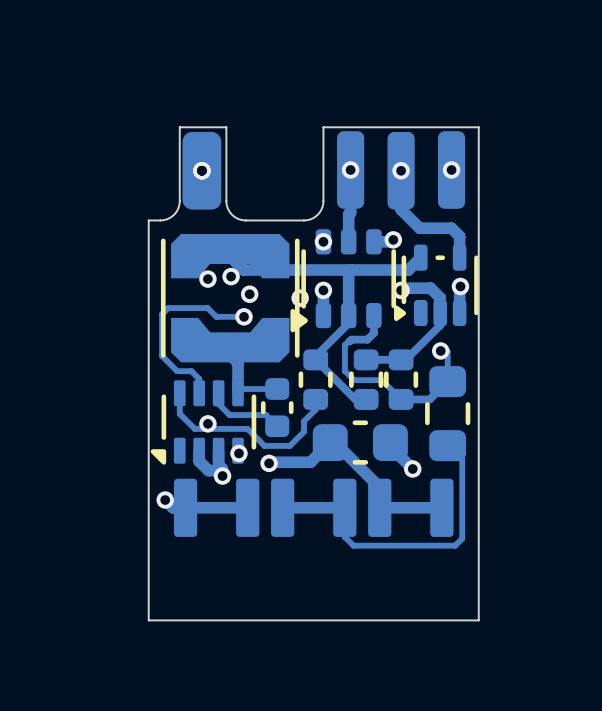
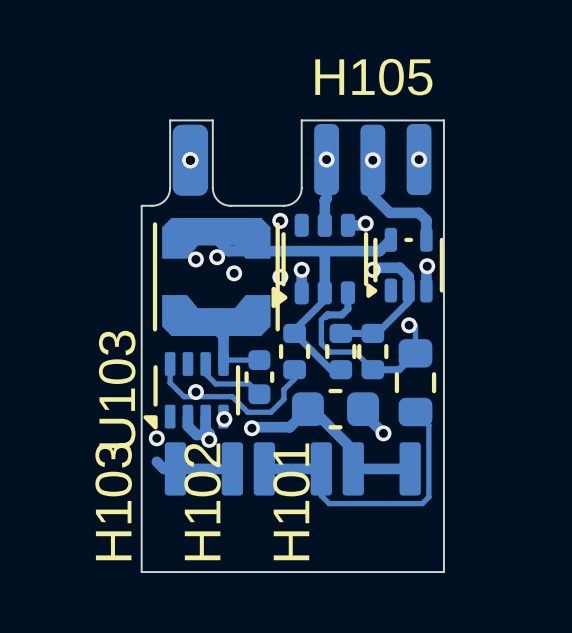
H105 name: none -> H105 (373, 77)
via position: (323, 241) -> (280, 220)
track: (244, 316) (216, 316) (207, 308) (168, 308) (162, 314) (162, 356) (177, 371) (191, 371) (199, 378) (199, 393) -> none
via: (244, 316) -> none
U103 name: none -> U103 (117, 389)
via position: (165, 500) -> (156, 438)
H103 name: none -> H103 (113, 501)
H102 name: none -> H102 (202, 501)
H101 name: none -> H101 (291, 501)

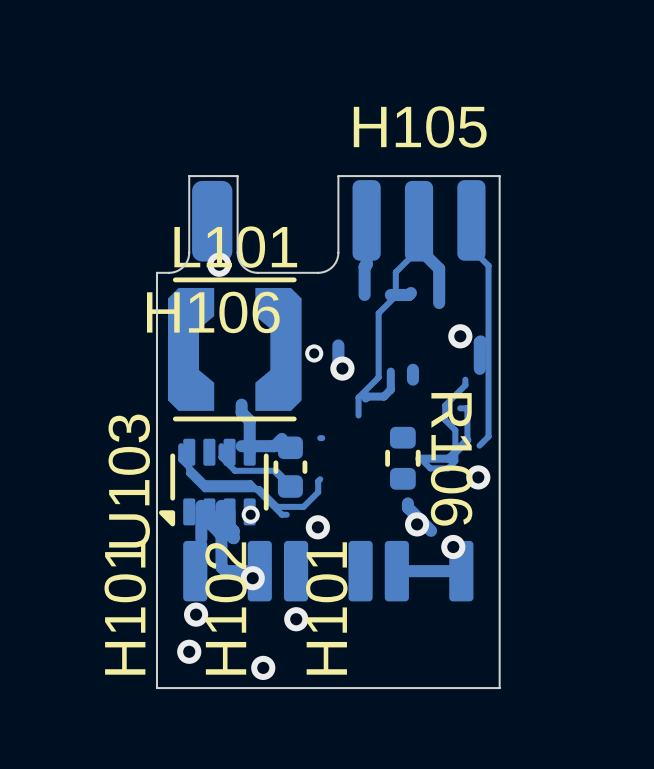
via: (326, 159) -> none
track: none -> (471, 220) (471, 248) (488, 265) (488, 436) (479, 445)
via: (419, 159) -> none
via: (190, 160) -> none
track: none -> (419, 221) (419, 248) (439, 268) (439, 303)
via: (372, 160) -> none
track: (372, 184) (372, 195) (389, 212) (419, 212) (426, 220) (426, 239) -> (419, 249) (395, 272) (395, 296) (378, 313) (378, 377) (358, 397) (358, 415)
via: none -> (219, 264)
via: (280, 220) -> none
via: (365, 223) -> none
track: (216, 231) (216, 238) (228, 251) (379, 251) (390, 239) -> none
H106 name: none -> H106 (213, 312)
track: (326, 251) (324, 252) (324, 300) (294, 330) (294, 333) (330, 369) (340, 369) -> none
via: (217, 257) -> none
via: (195, 259) -> none
part: (319, 260) -> none
part: (405, 265) -> none
via position: (427, 266) -> (460, 336)
via: (301, 269) -> none
track: (372, 269) (374, 267) (399, 267) (408, 276) (408, 301) (377, 333) (340, 333) -> none
via: (372, 269) -> none
L101: none -> (234, 349)
via: (234, 273) -> none
part: (216, 276) -> none
via: none -> (342, 368)
track: none -> (412, 369) (412, 379)
track: none -> (465, 379) (465, 385) (445, 405) (445, 420) (455, 430) (455, 461) (448, 468) (430, 468) (420, 458)
track: (328, 316) (325, 316) (321, 319) (321, 343) (329, 352) (355, 352) (372, 369) -> none
via: (409, 325) -> none
track: none -> (322, 438) (320, 438)
part: (294, 351) -> none
part: (340, 351) -> none
part: (372, 351) -> none
track: none -> (281, 438) (274, 446) (241, 446)
track: none -> (181, 446) (181, 459) (204, 483) (250, 483) (281, 514) (286, 514)
track: none -> (221, 446) (221, 457) (234, 470) (275, 470) (281, 477) (276, 471)
track: (205, 364) (205, 373) (215, 383) (249, 383) (259, 394) -> none
track: (294, 369) (294, 378) (285, 387) -> none
R106: none -> (402, 458)
part: (415, 382) -> none
via: none -> (478, 477)
via: (195, 392) -> none
part: (335, 409) -> none
track: none -> (201, 505) (201, 538)
track: (415, 412) (428, 425) (428, 497) (422, 503) (329, 503) (321, 495) (321, 468) (264, 468) -> none
track: (251, 428) (289, 427) (307, 409) (312, 409) (353, 450) (353, 468) -> none
via: (251, 428) -> none
via: none -> (317, 527)
via position: (383, 433) -> (417, 524)
via: (156, 438) -> none
via: (209, 439) -> none
via: none -> (453, 547)
track: (156, 461) (163, 468) (202, 468) -> (221, 505) (221, 567) (225, 571)
via: none -> (252, 578)
H103 name: H103 (113, 501) -> H101 (125, 608)
via: none -> (196, 614)
via: none -> (296, 619)
via: none -> (189, 651)
via: none -> (263, 667)

